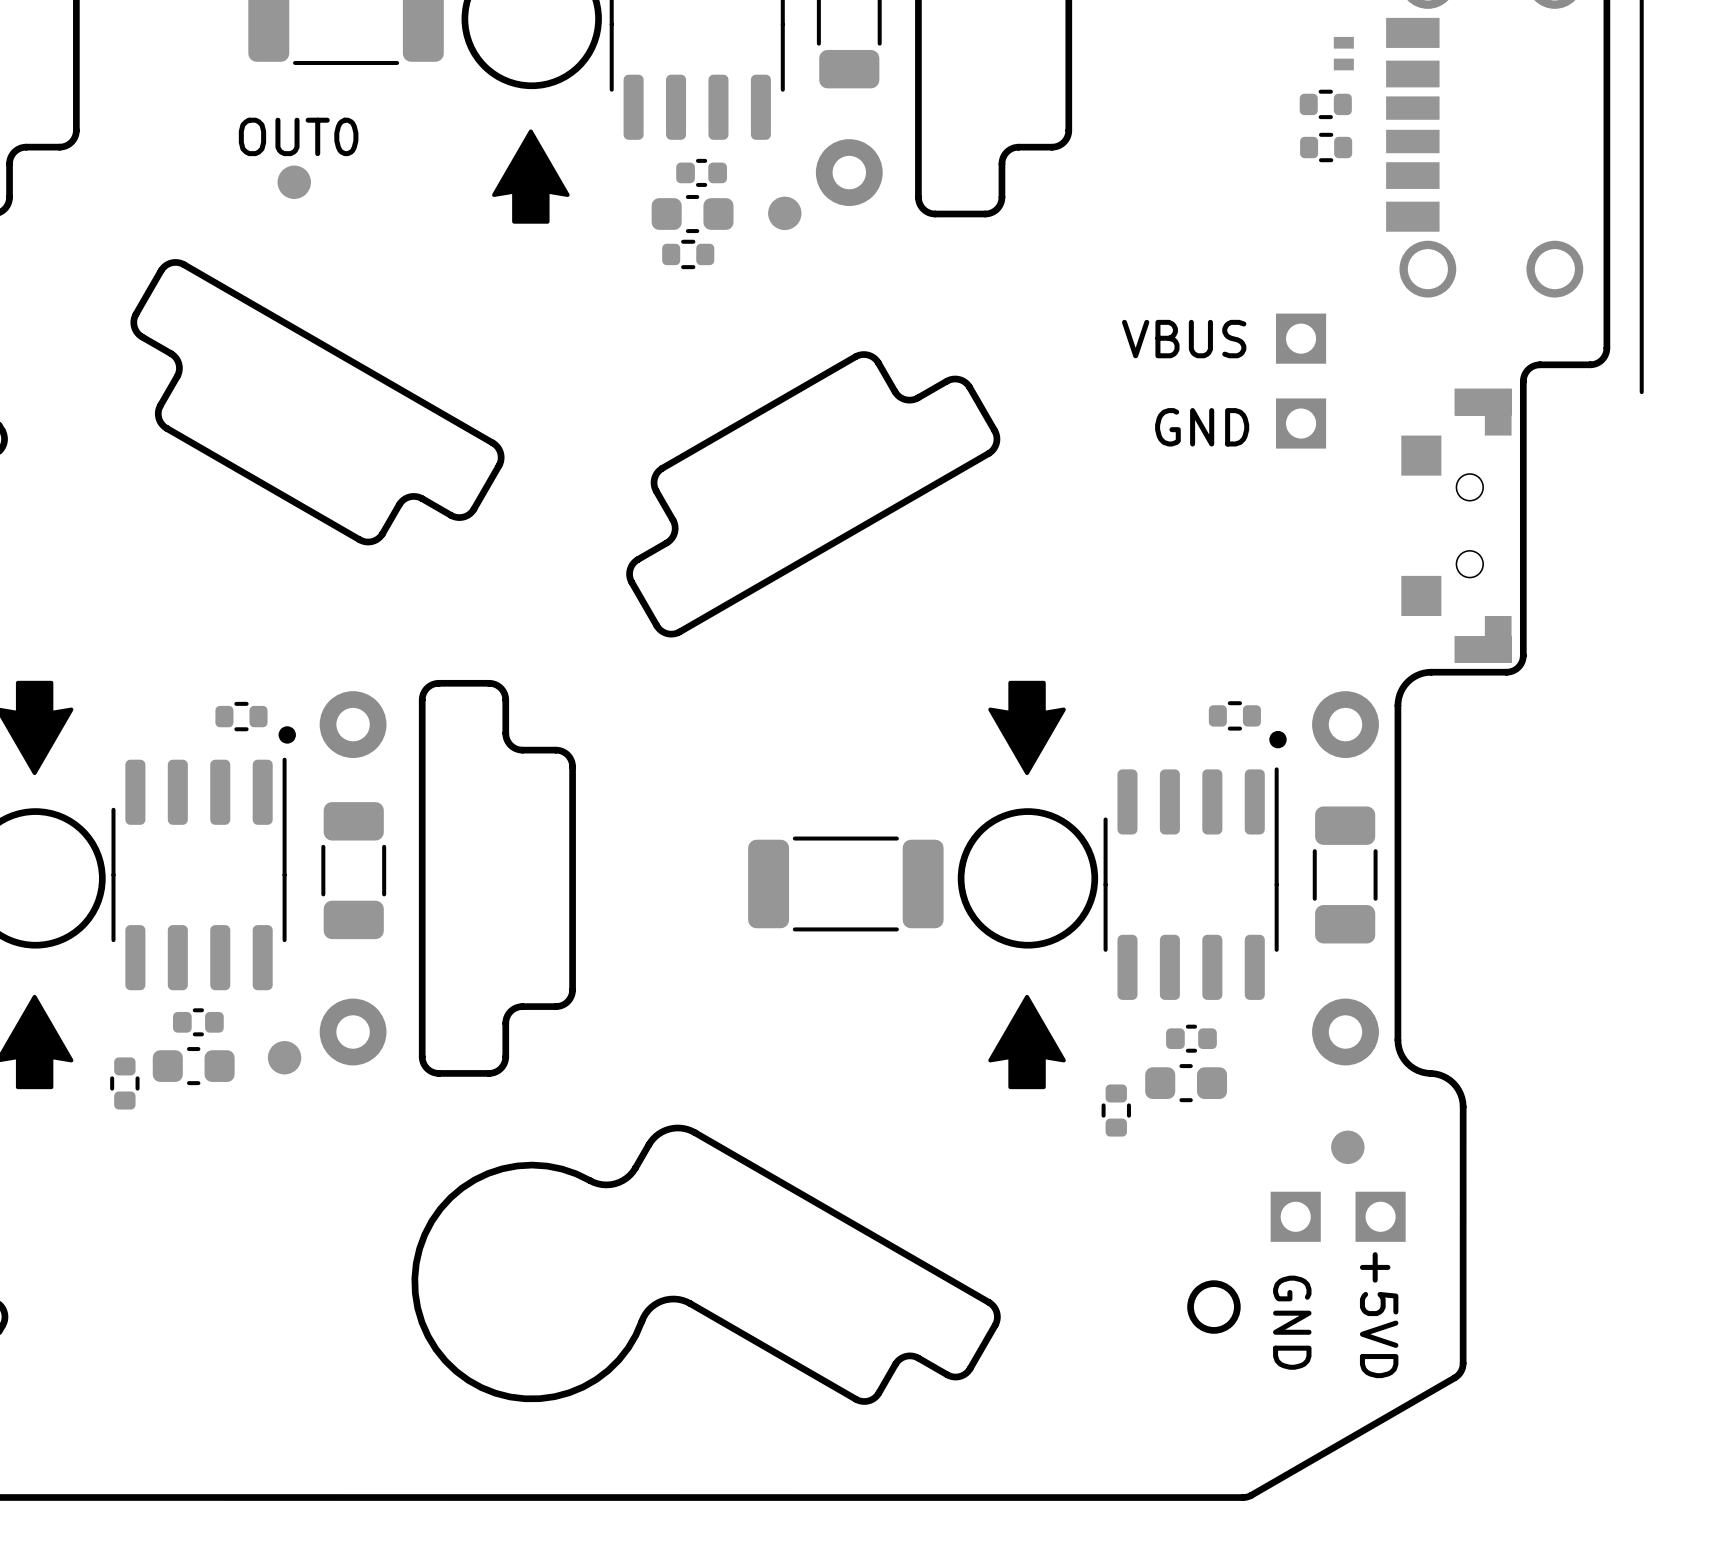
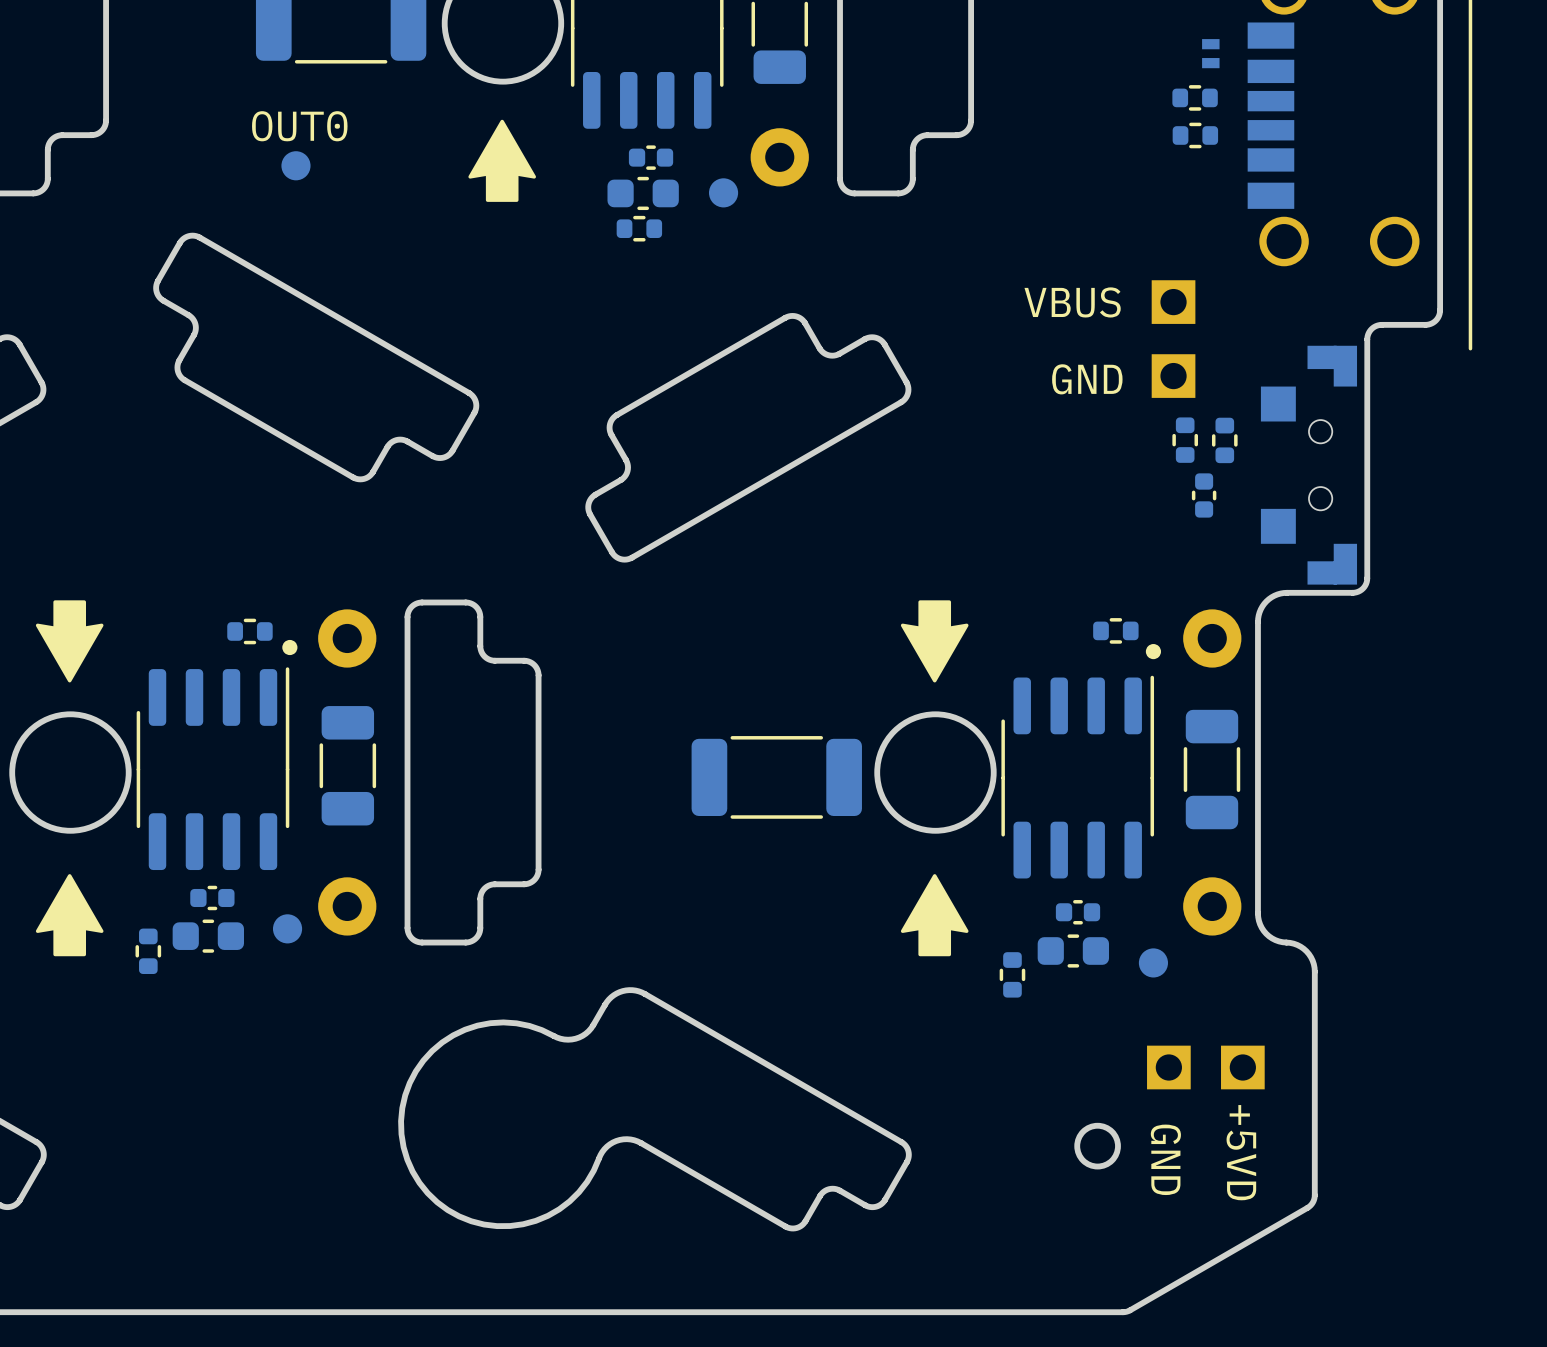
part footprint: [1401, 388, 1512, 663] -> [1260, 345, 1358, 585]
part: none -> (1185, 440)
part: none -> (1224, 440)
part: none -> (1204, 495)
part position: (1347, 1147) -> (1153, 962)

